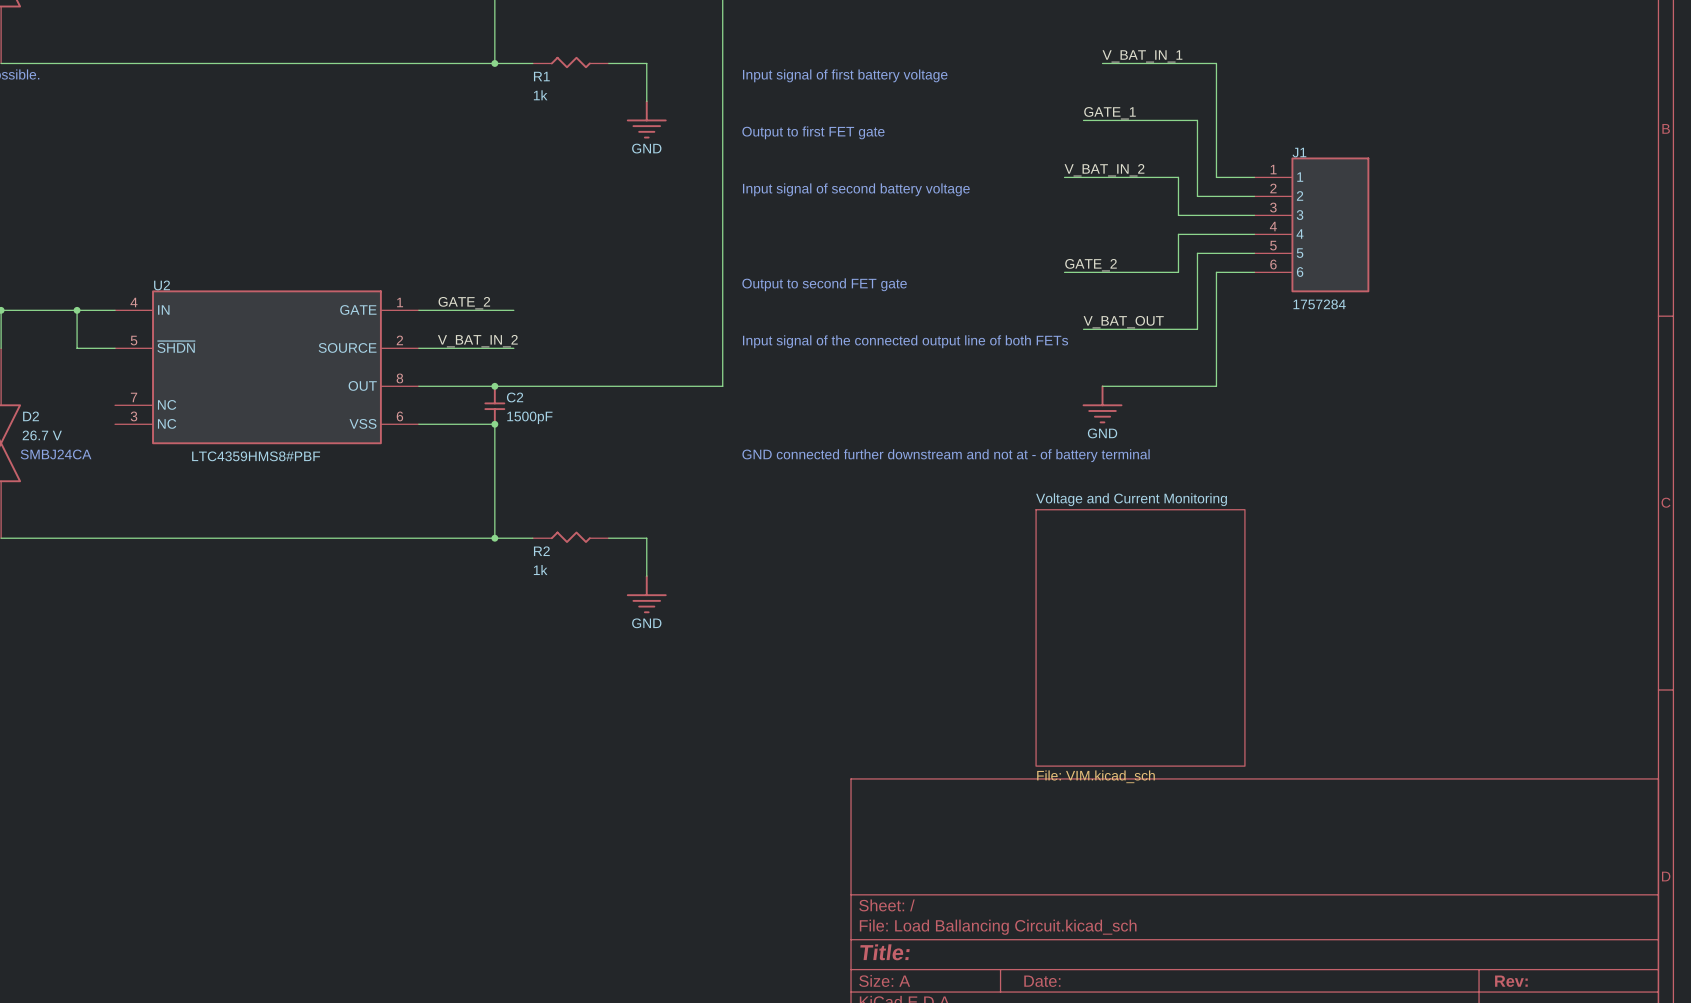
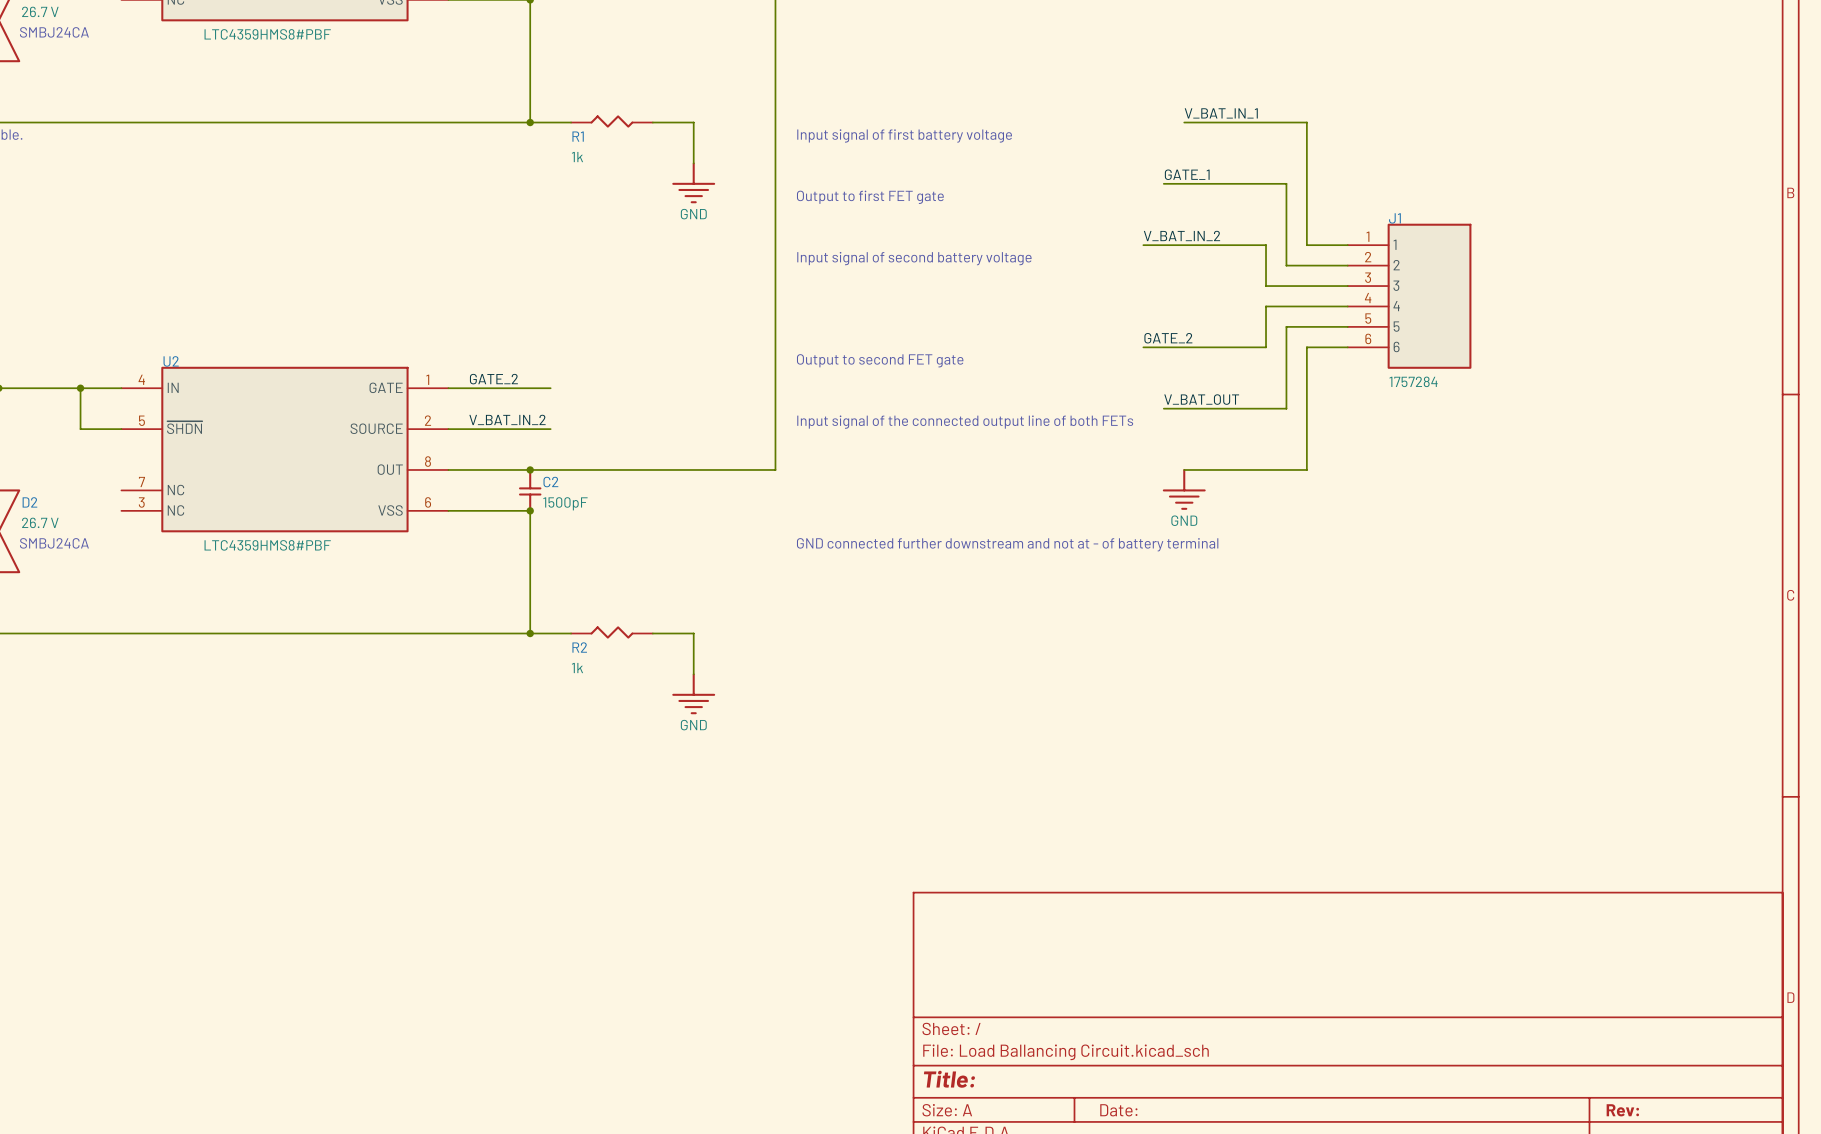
sheet Voltage and Current Monitoring: File: VIM.kicad_sch (1140, 637) -> none

